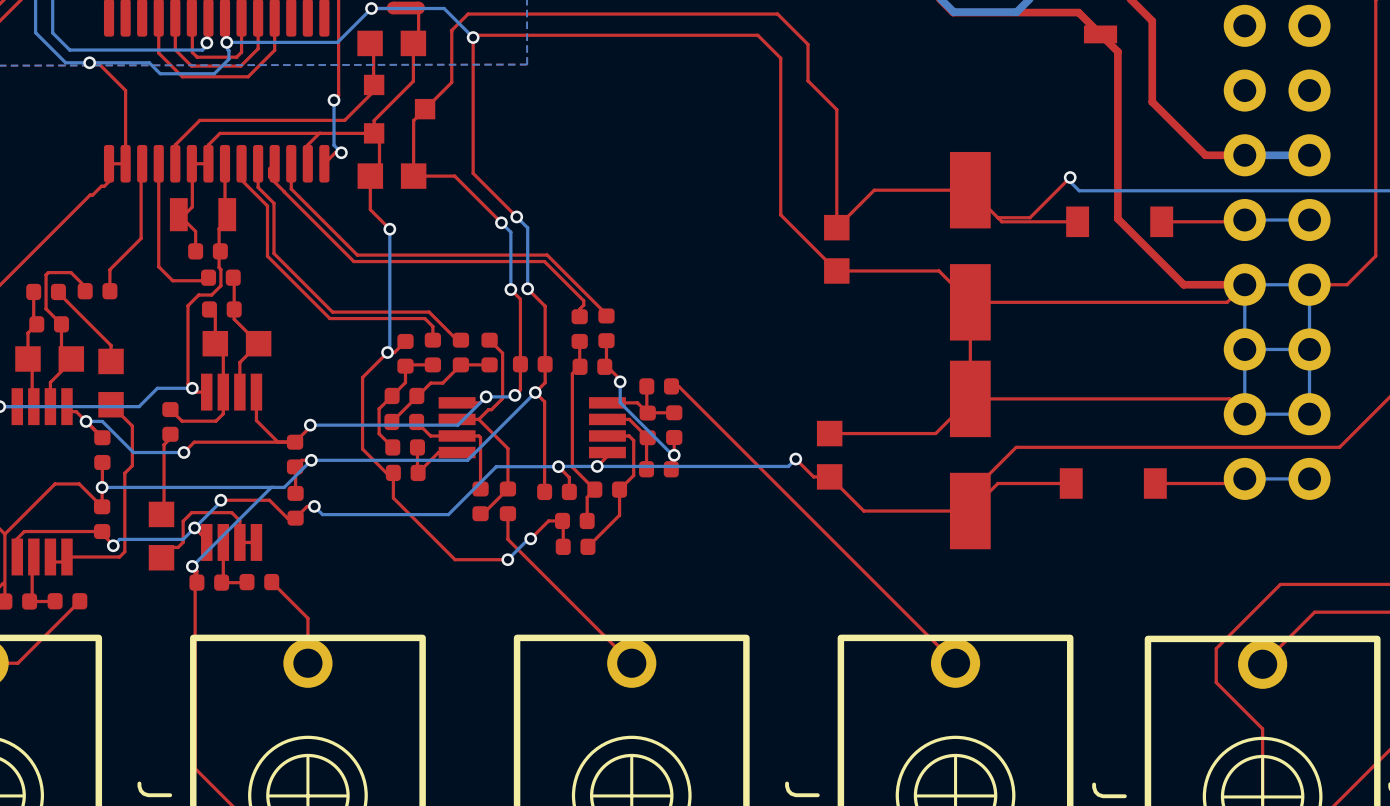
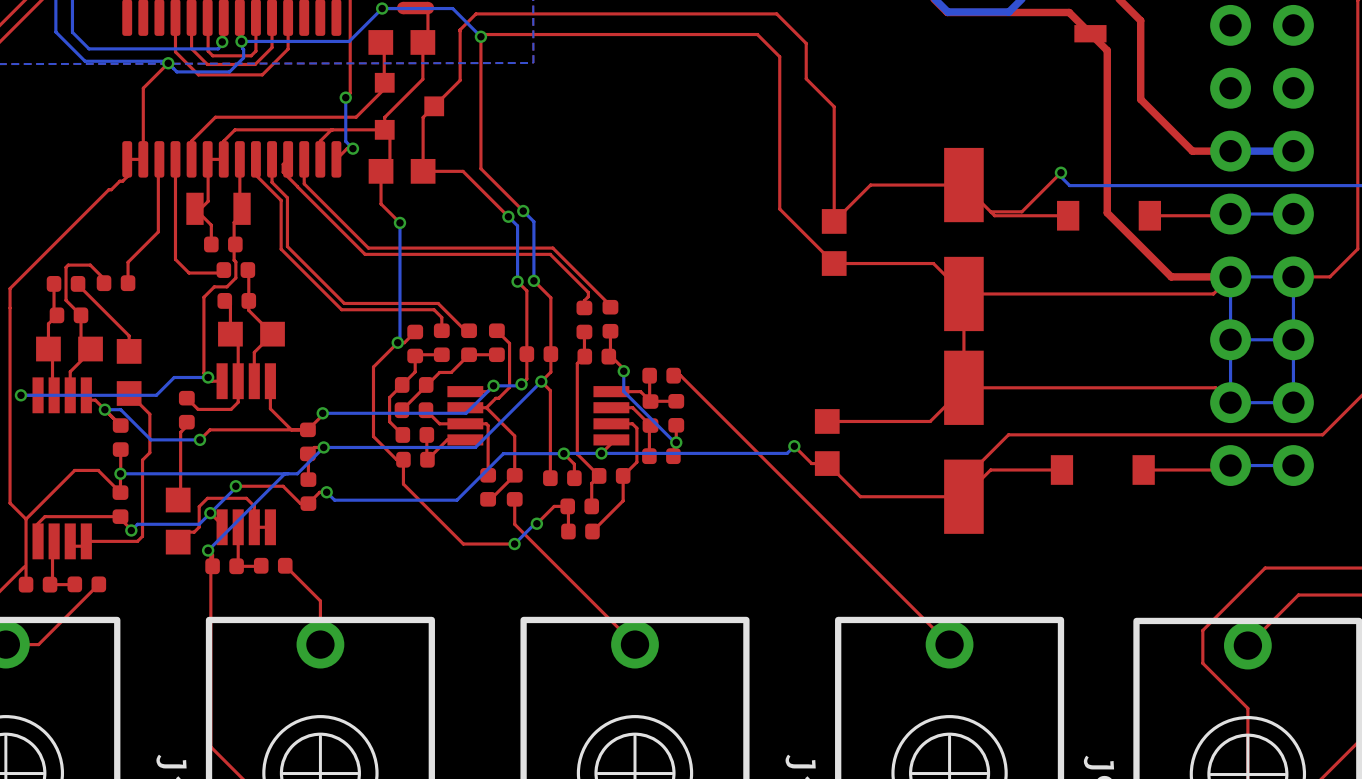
top track: (89, 62) (97, 62) (125, 90) -> (168, 63) (143, 88)
via position: (89, 62) -> (168, 63)

